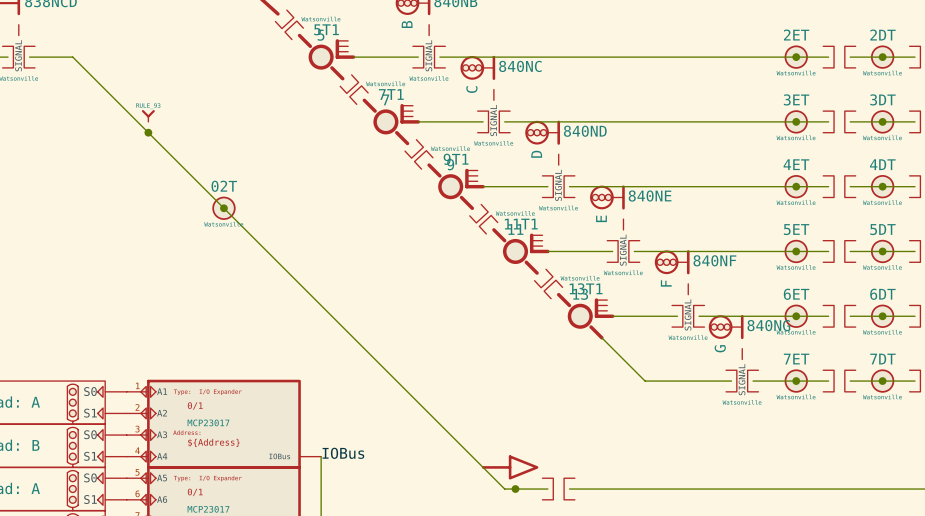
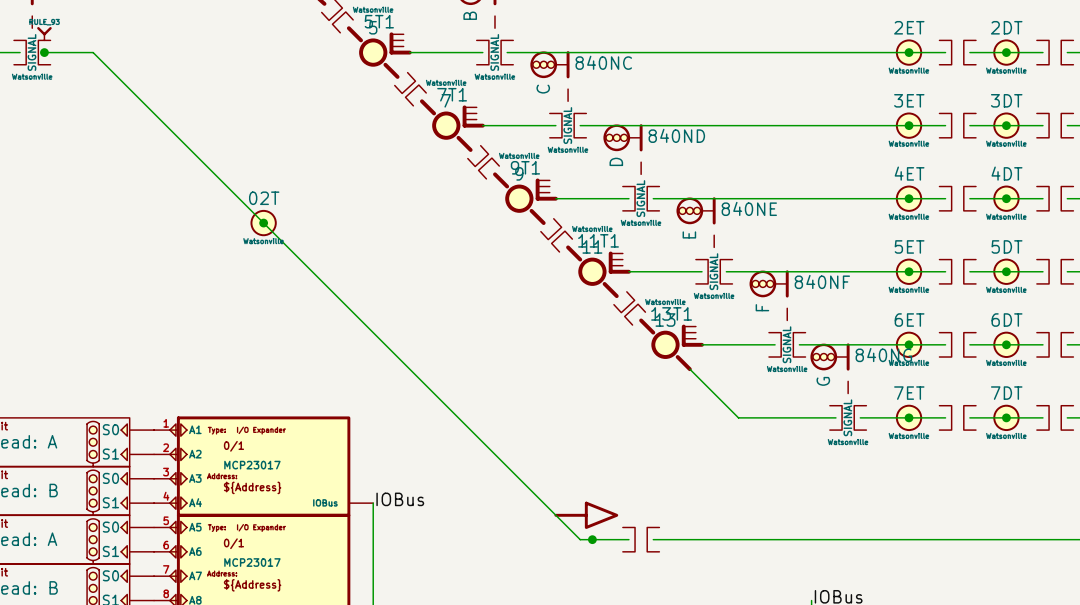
junction: none -> (44, 52)
part position: (148, 116) -> (44, 34)
junction: (148, 132) -> none

